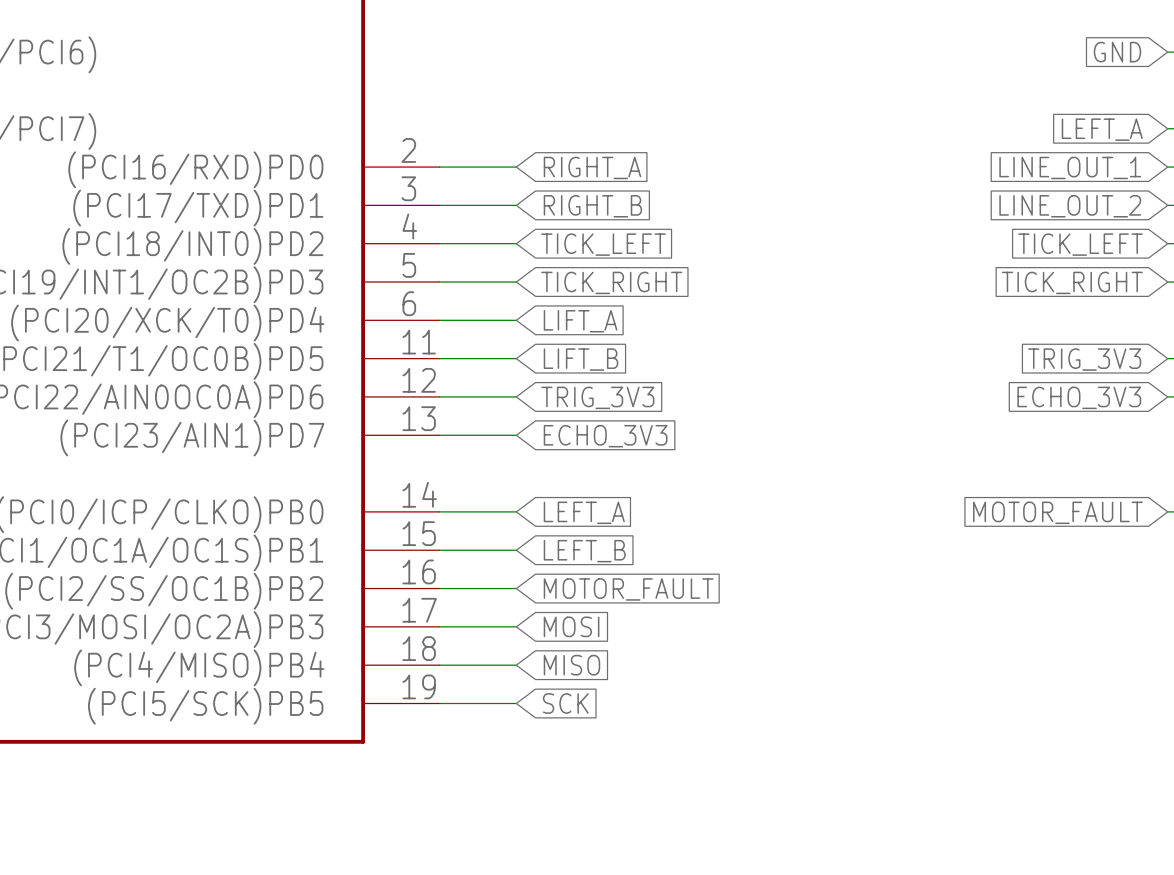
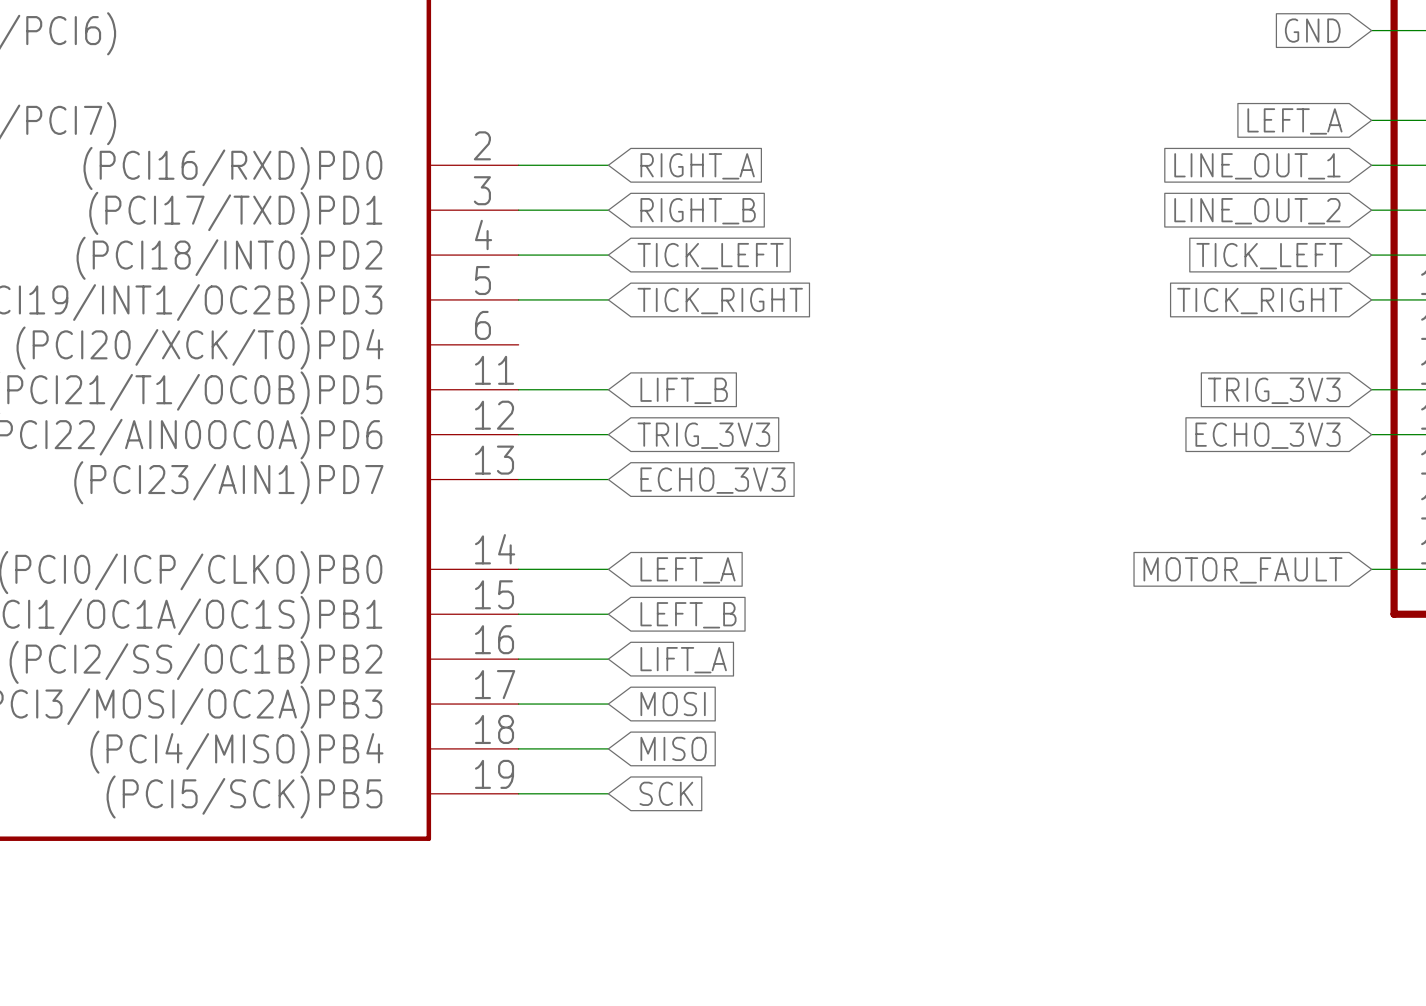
wire: (439, 320) (516, 320) -> none
global label: LIFT_A (580, 321) -> none
global label: MOTOR_FAULT (628, 589) -> LIFT_A (683, 660)

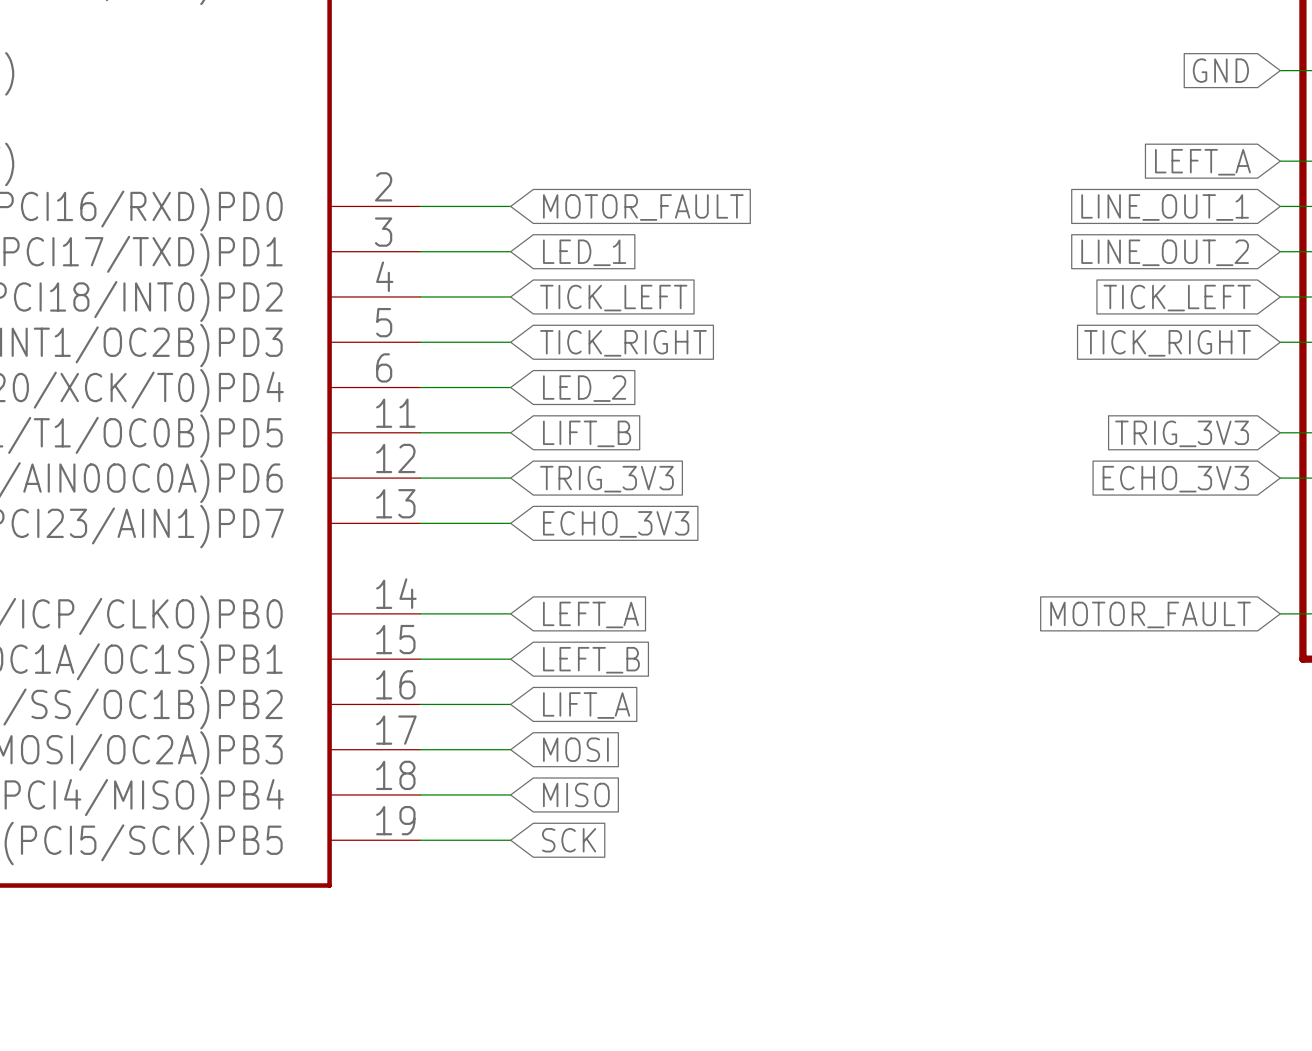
global label: RIGHT_A (697, 166) -> MOTOR_FAULT (643, 207)
global label: RIGHT_B (698, 211) -> LED_1 (584, 252)
wire: none -> (420, 387) (510, 387)
global label: none -> LED_2 (584, 388)

